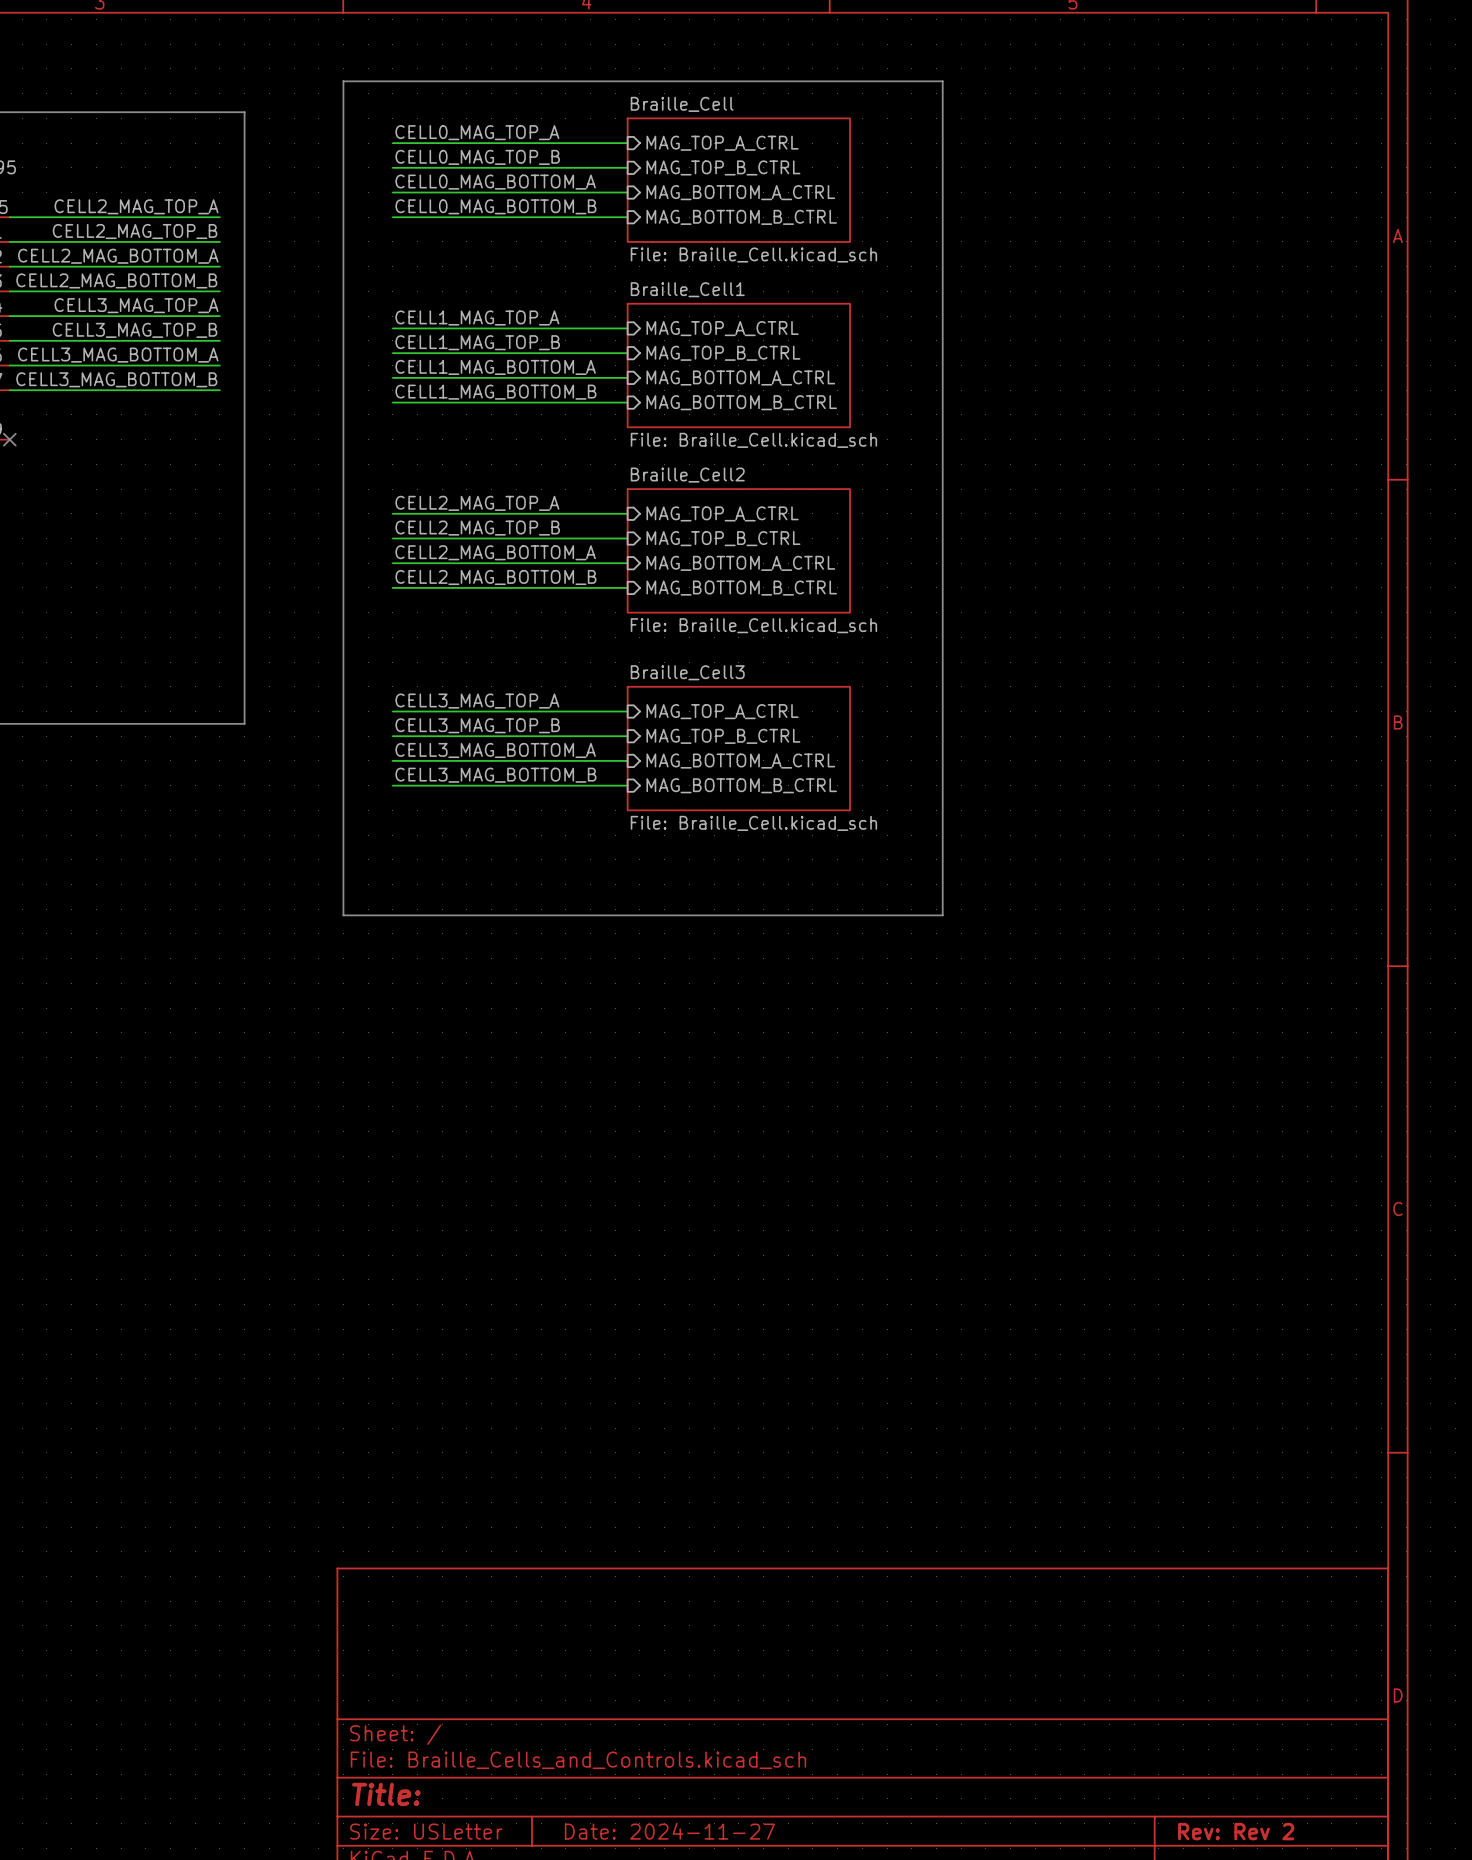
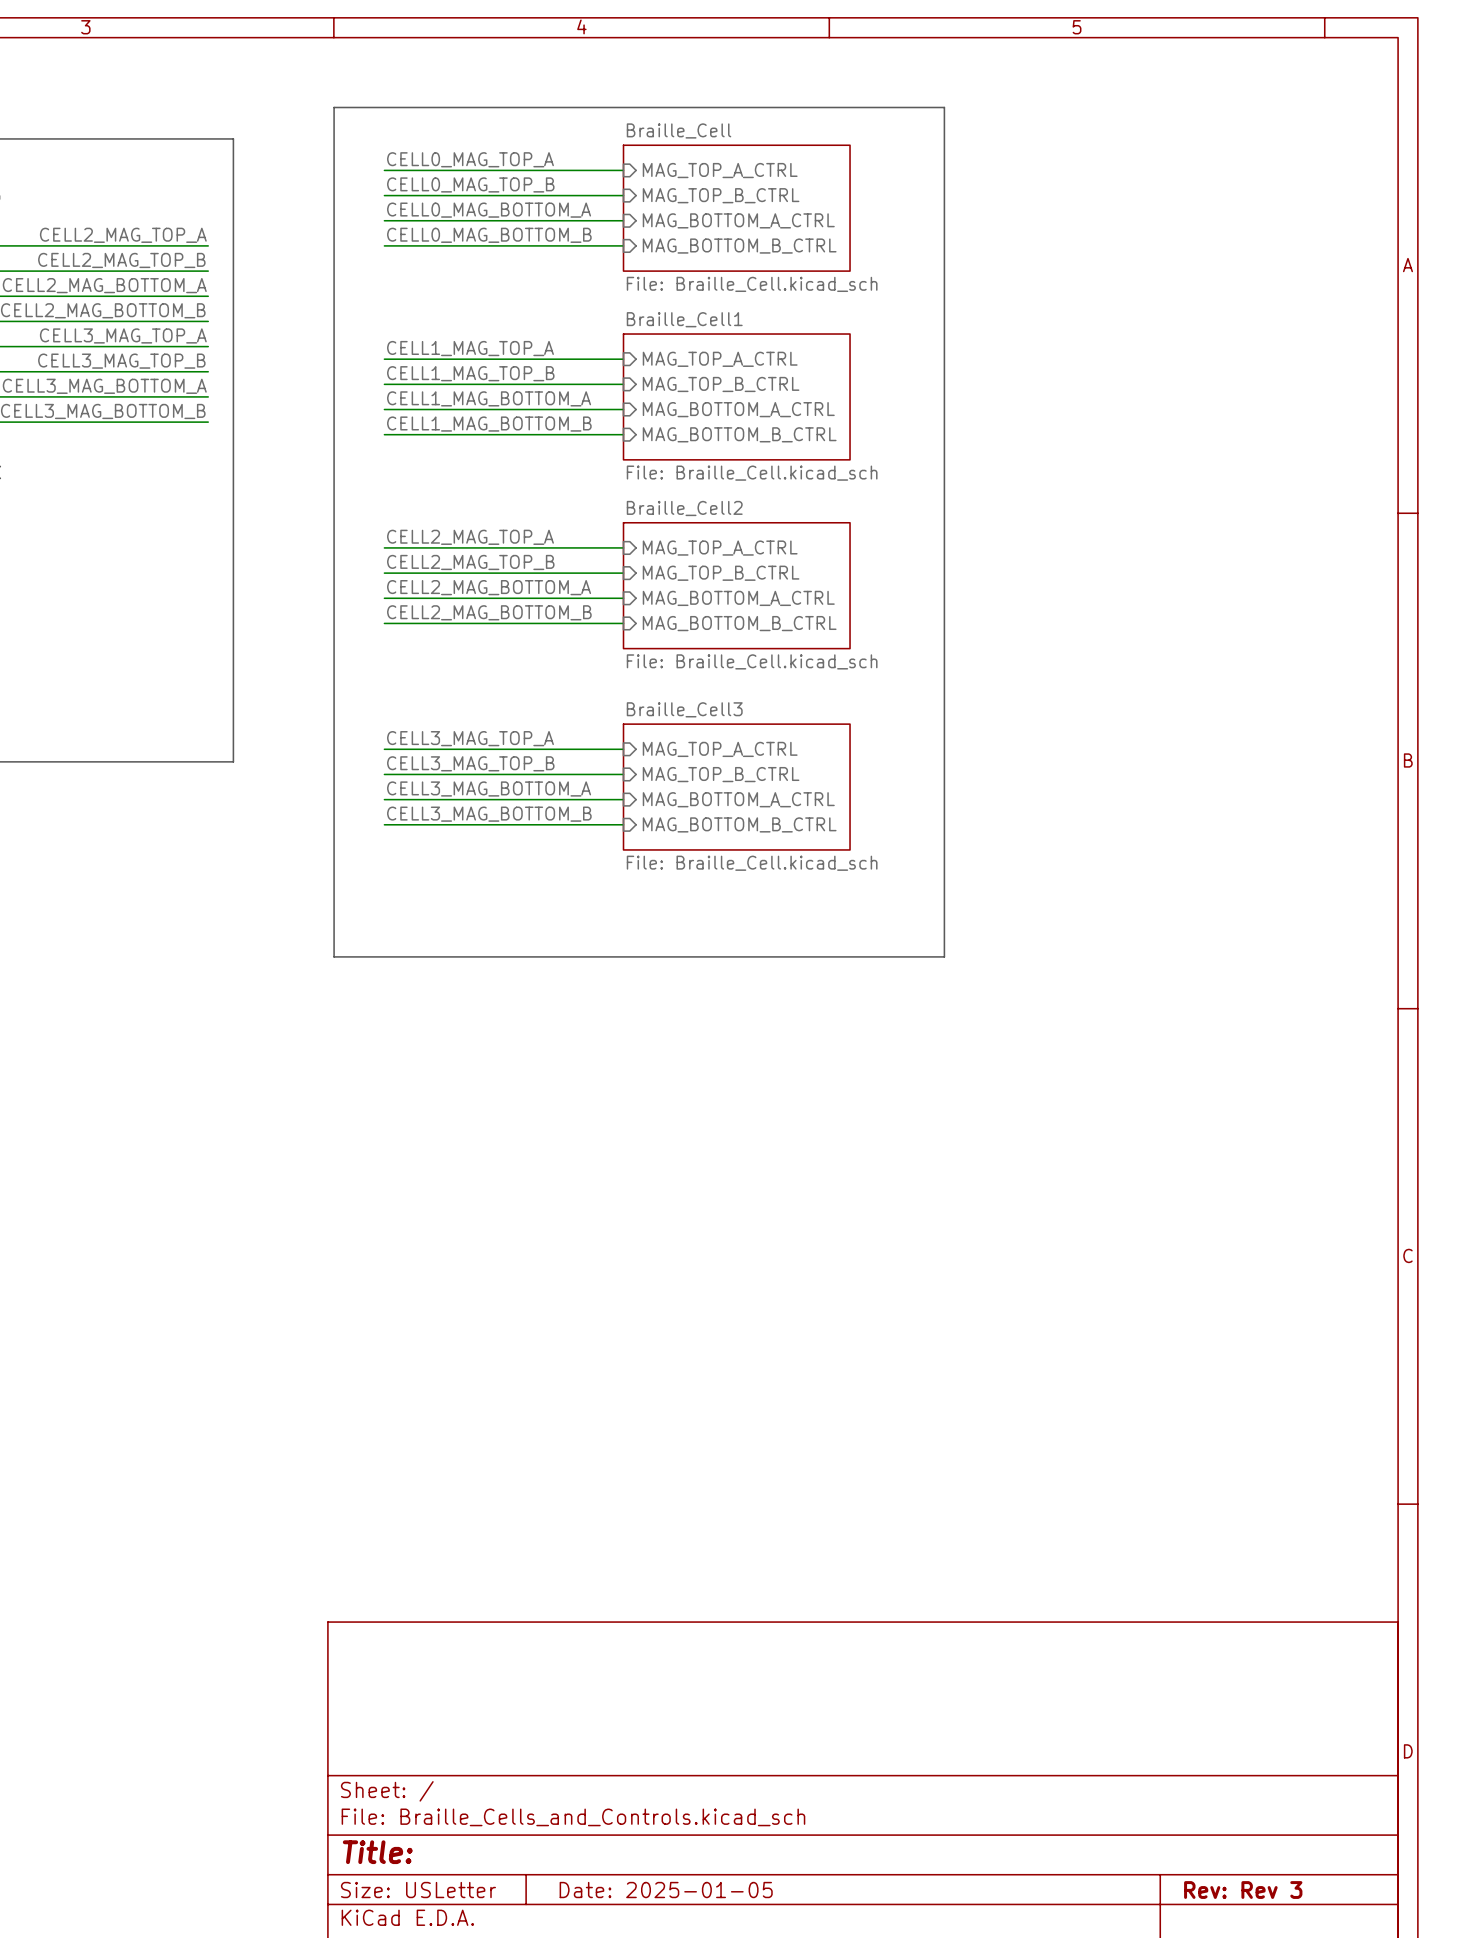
title block: Date: 2024-11-27 (669, 1831) -> Date: 2025-01-05 (666, 1890)
title block: Rev: Rev 2 (1236, 1831) -> Rev: Rev 3 (1243, 1890)

